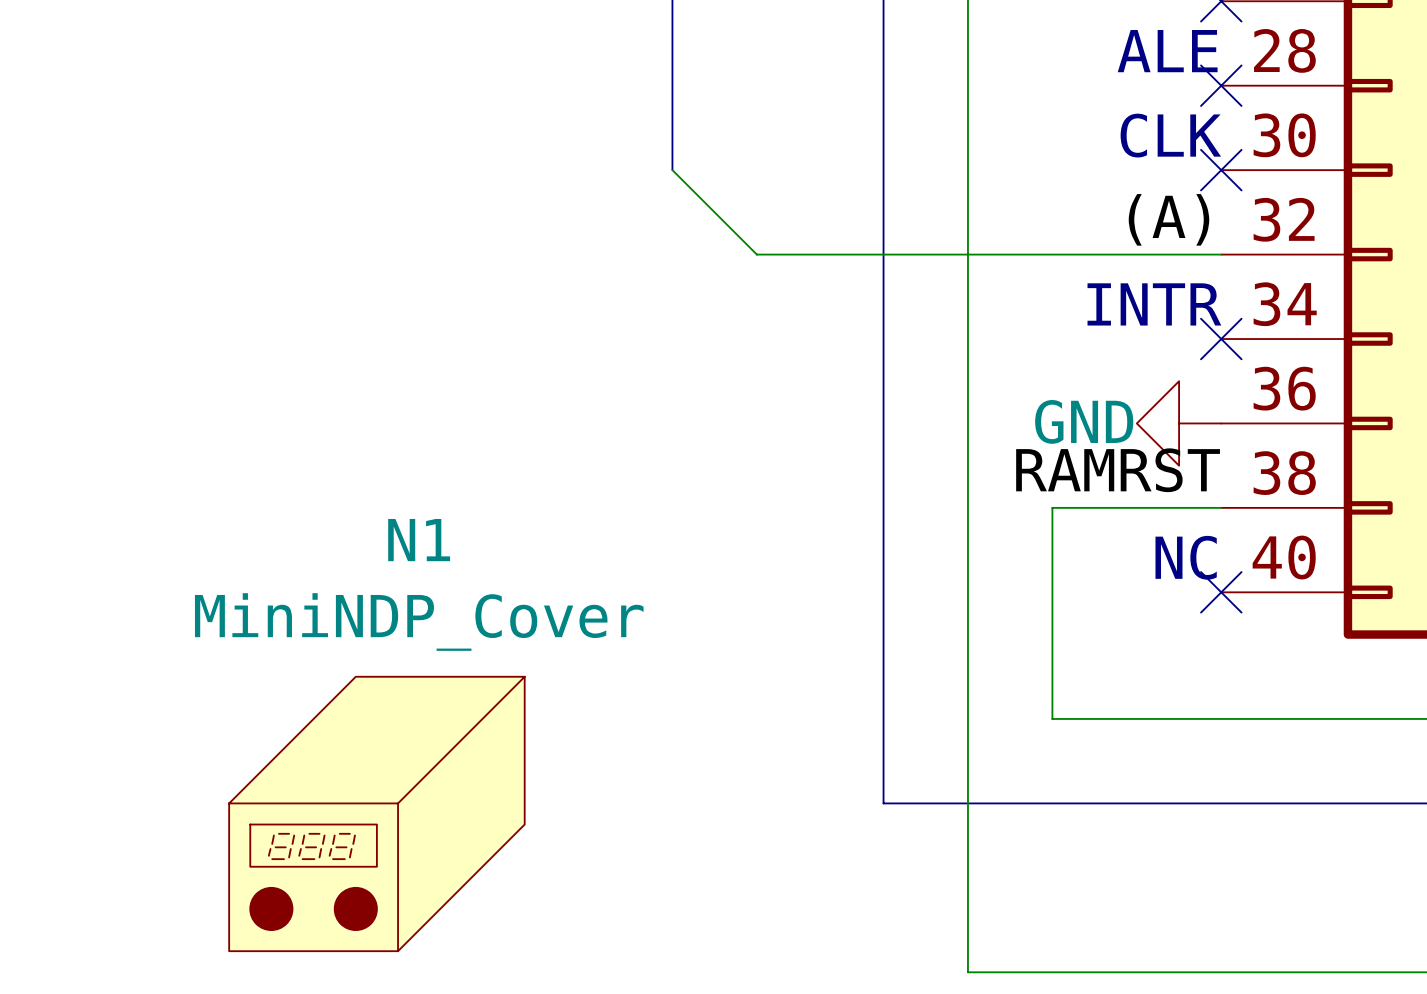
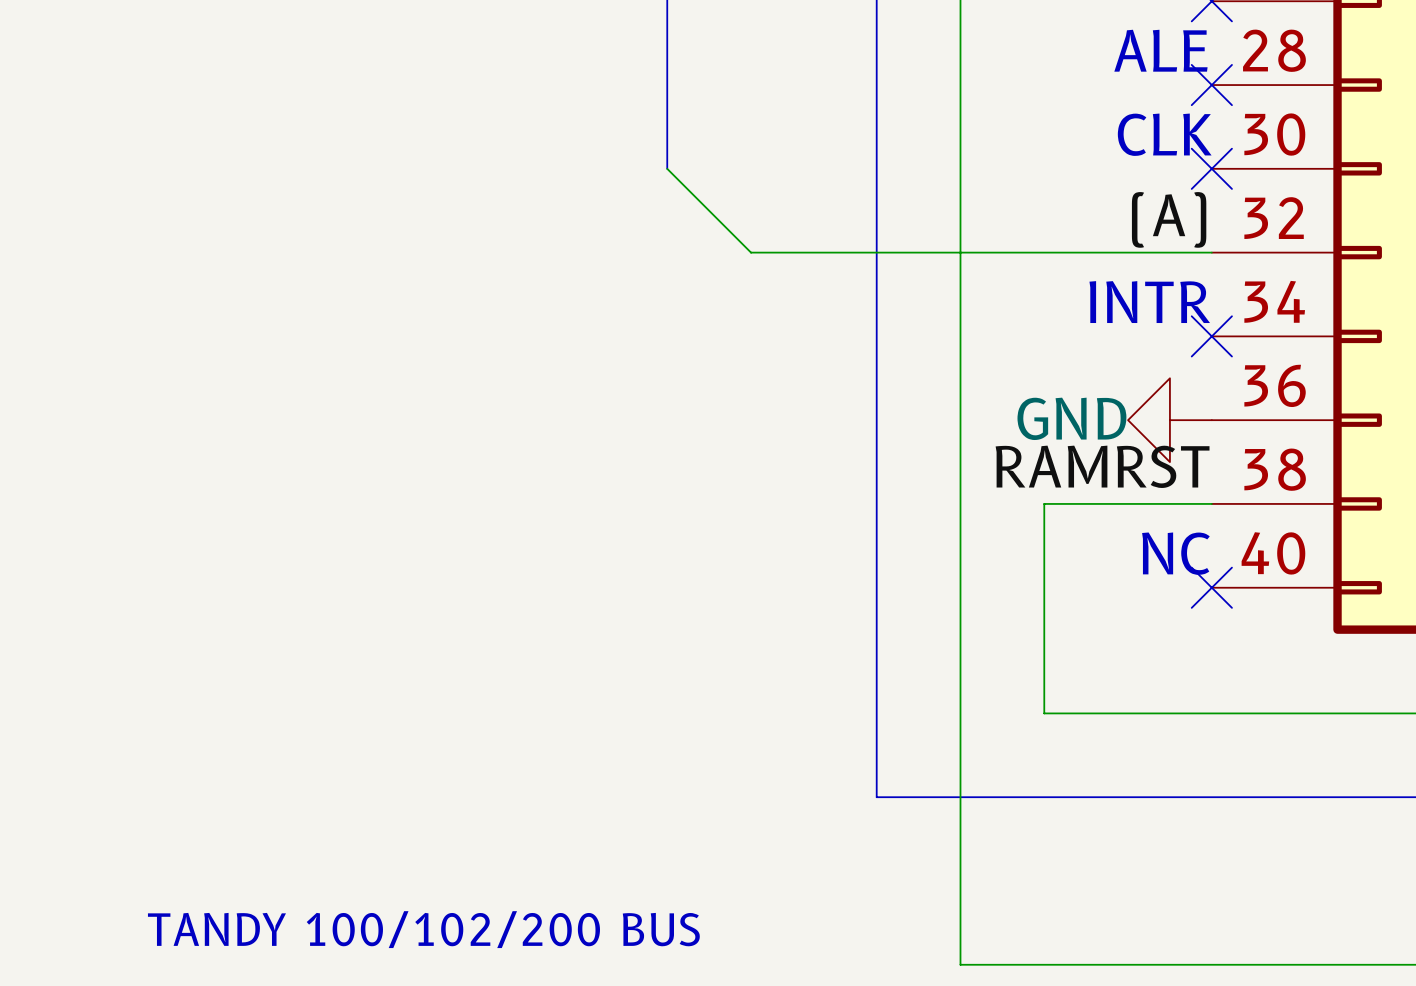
N1: MiniNDP_Cover (376, 813) -> none
text: none -> TANDY 100/102/200 BUS (423, 929)

